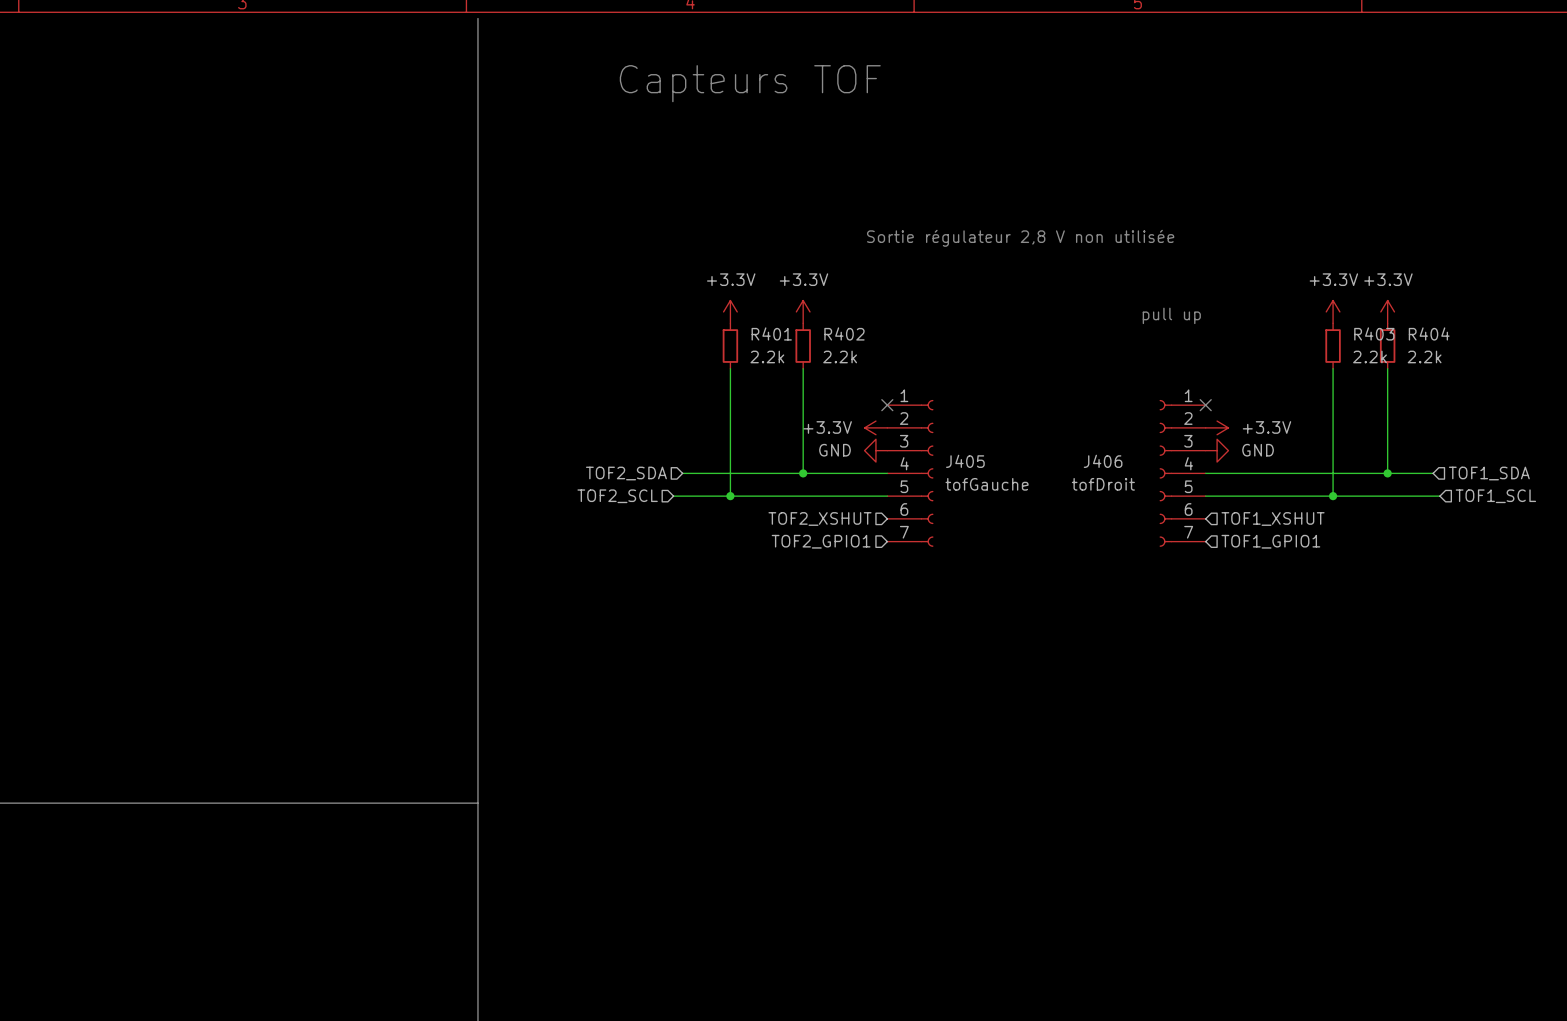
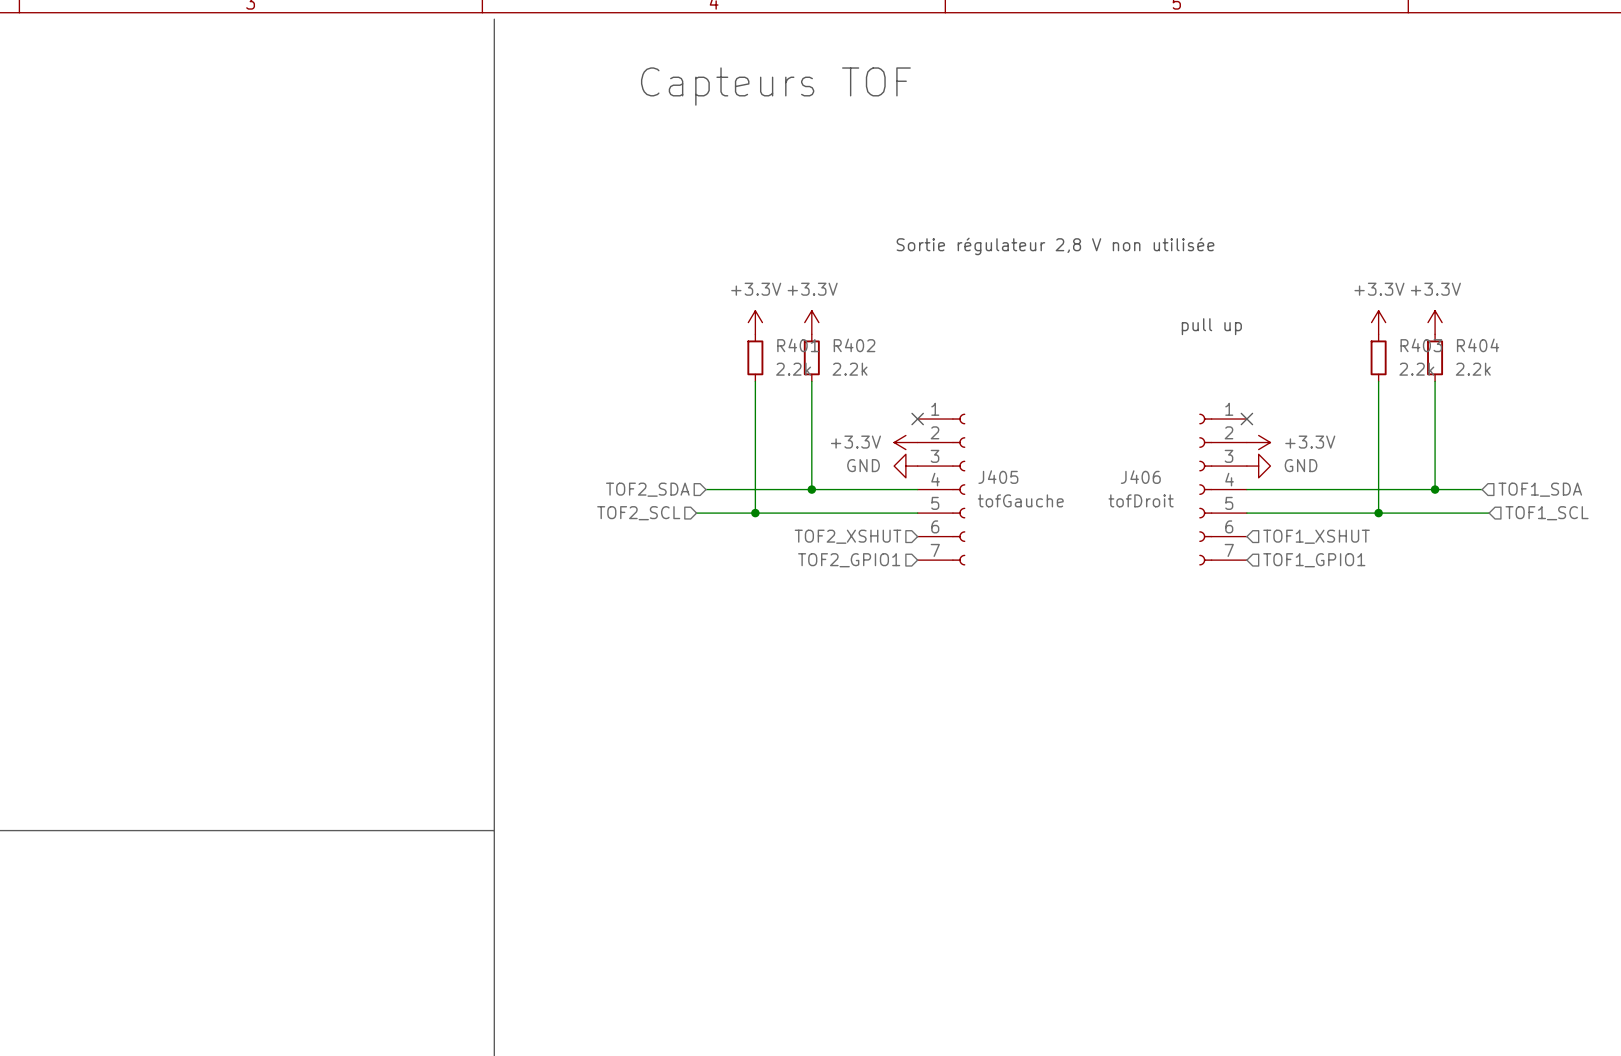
power symbol position: +3.3V (803, 311) -> +3.3V (811, 322)
R402 position: (803, 346) -> (811, 357)
wire: (803, 368) (803, 473) -> (811, 381) (811, 489)
junction position: (803, 473) -> (811, 489)

